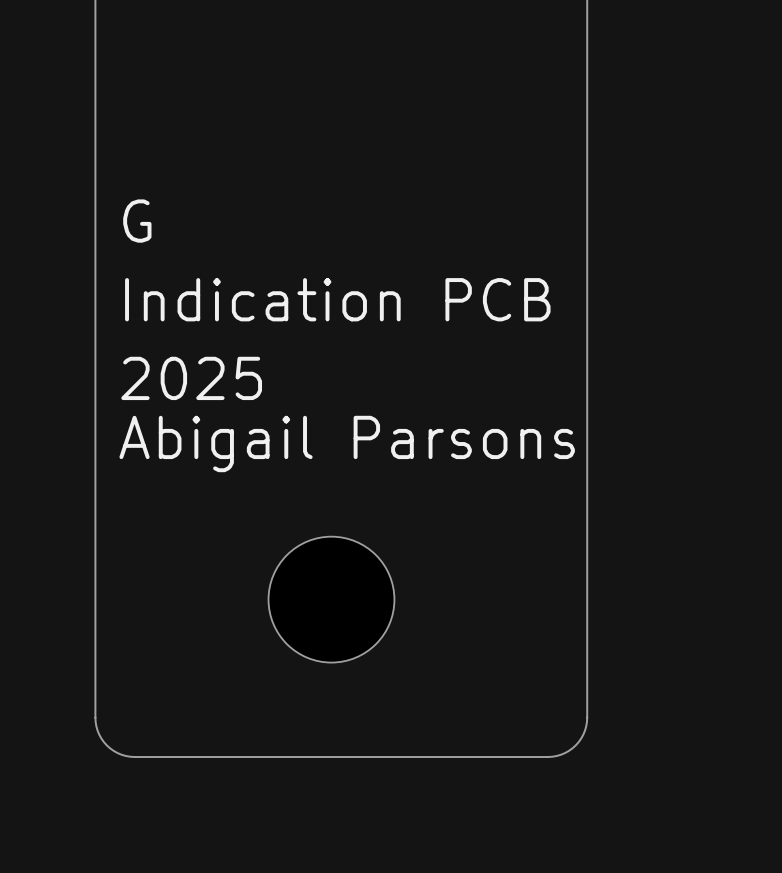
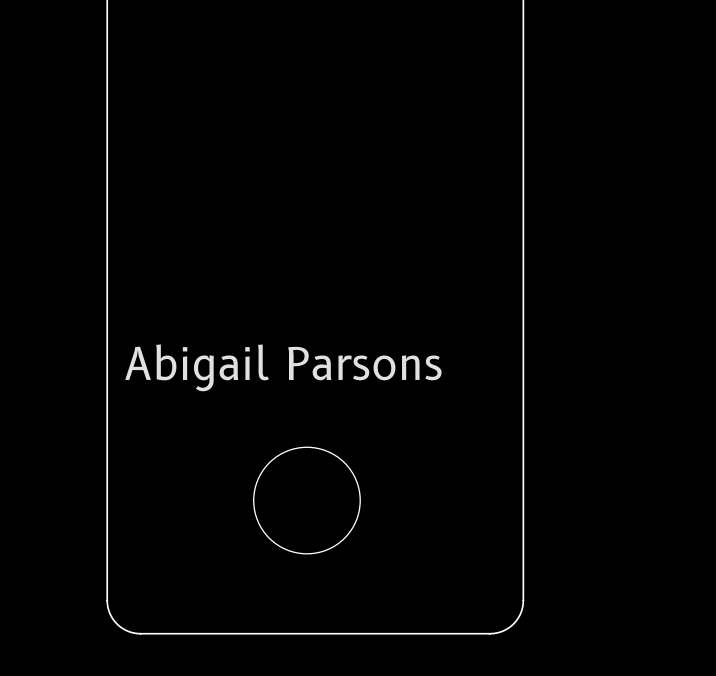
text: G (137, 221) -> none
text: Indication PCB (337, 299) -> none
text: 2025 (191, 378) -> none

